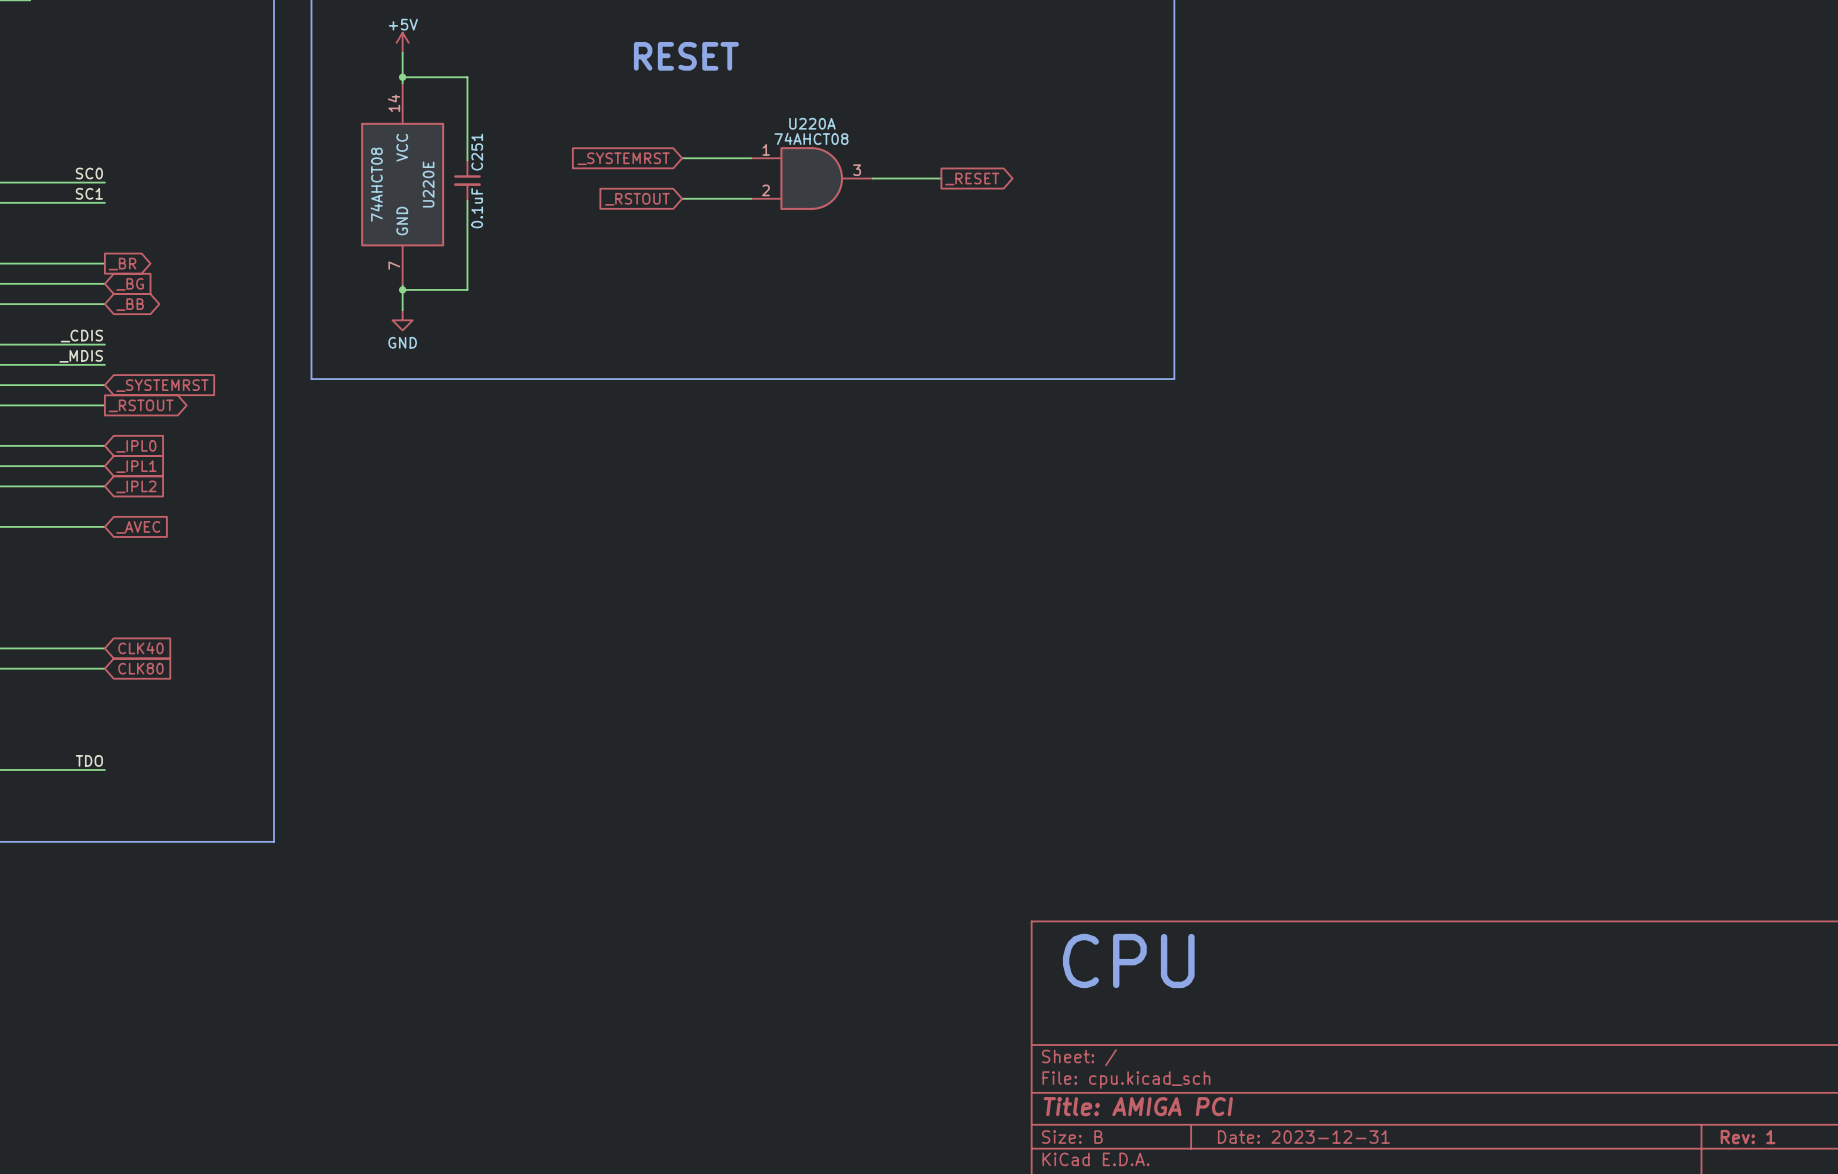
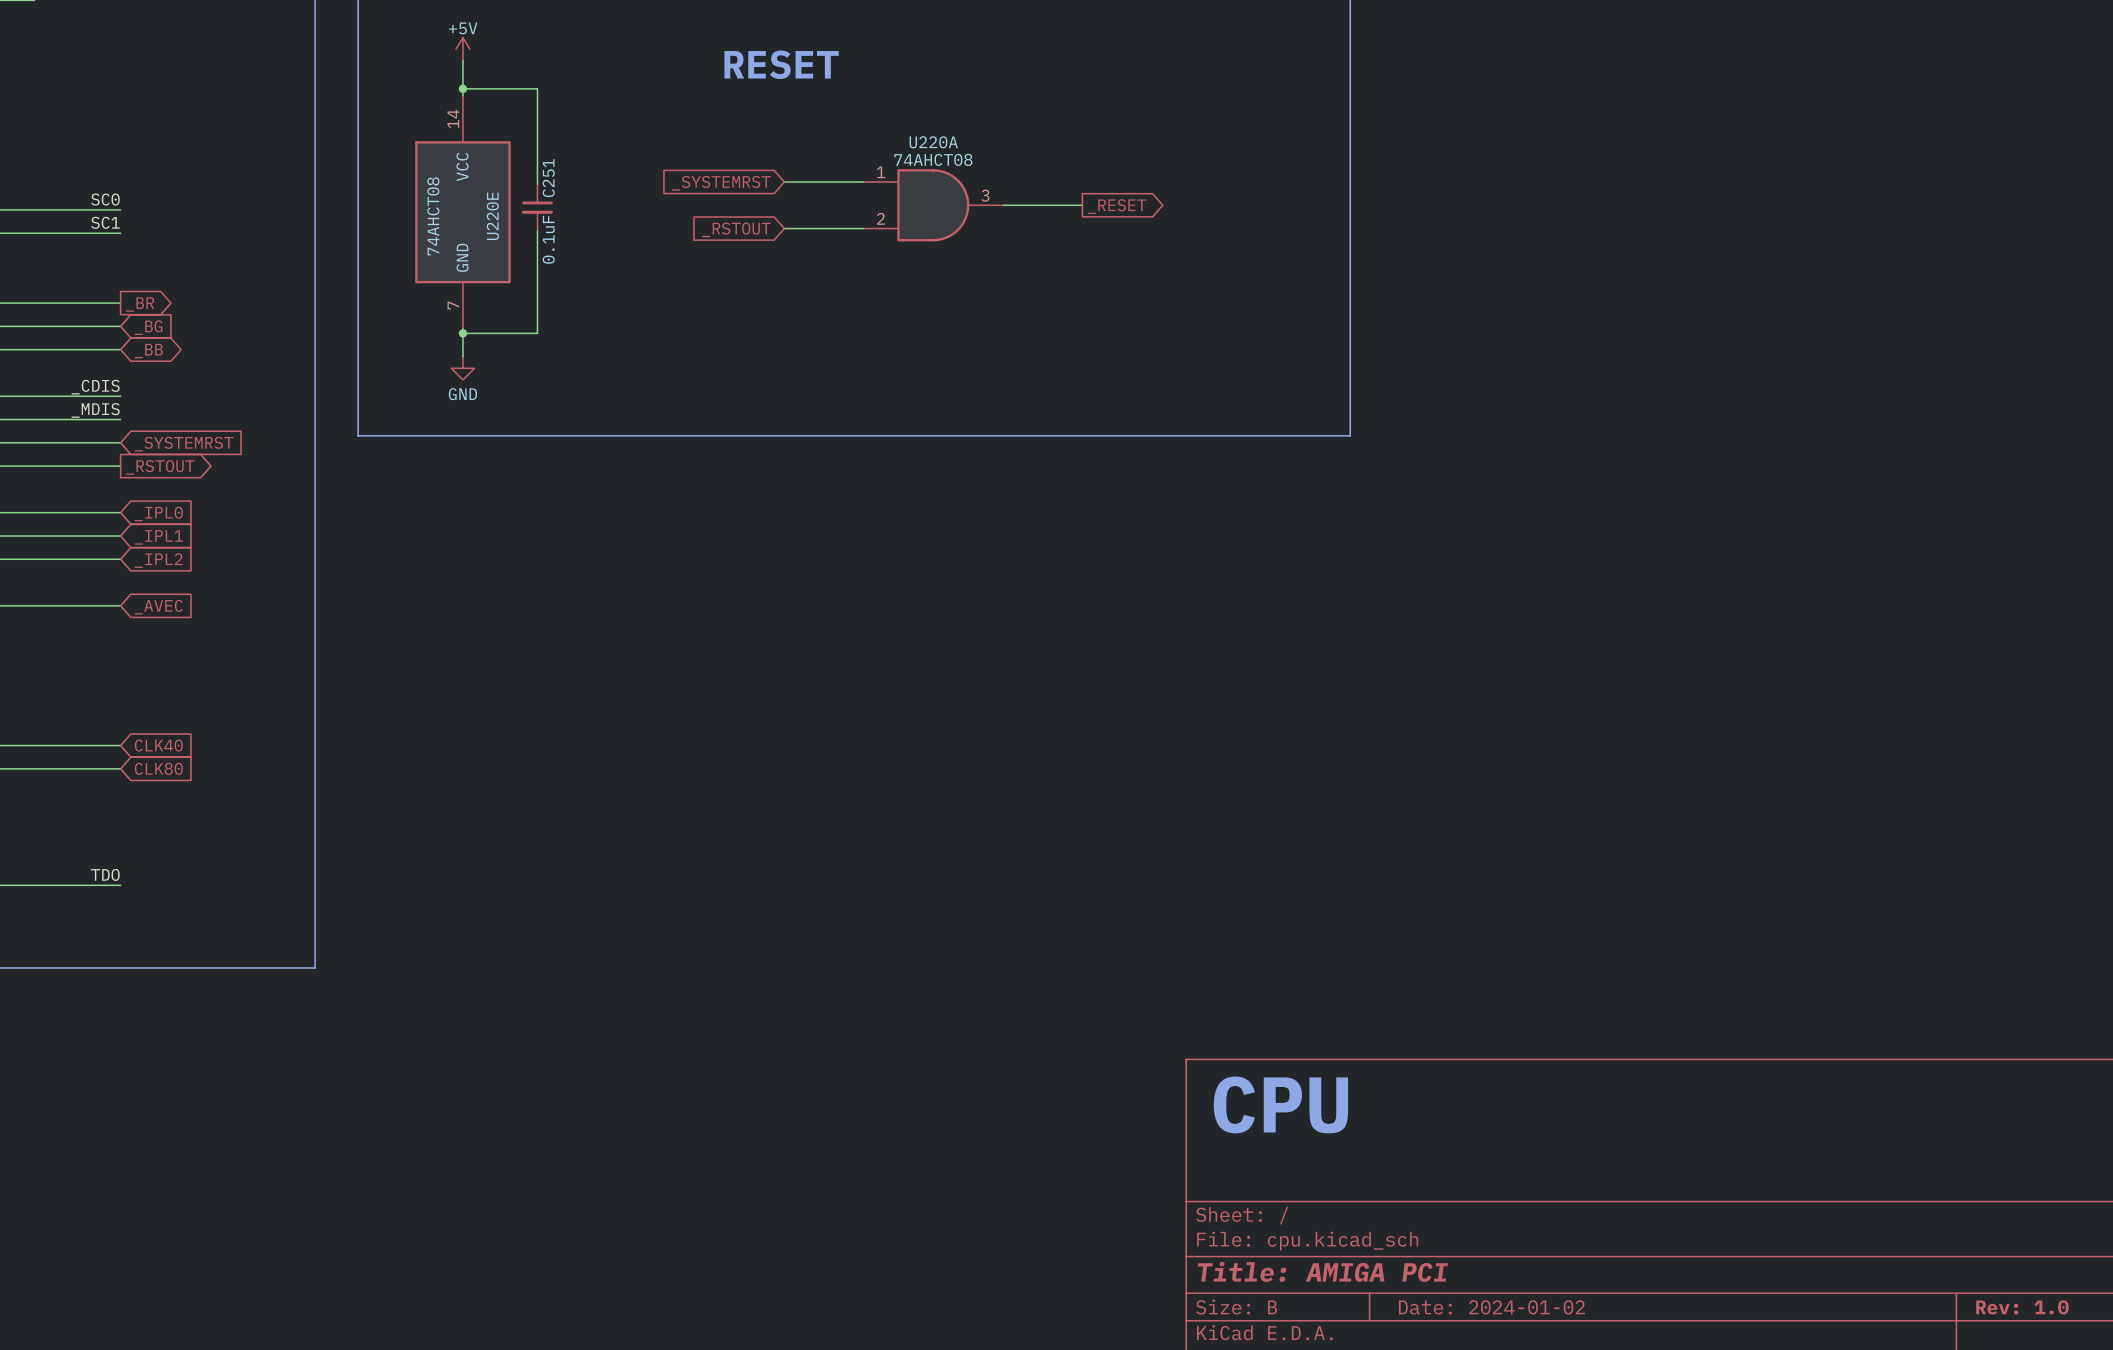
title block: Date: 2023-12-31 (1303, 1137) -> Date: 2024-01-02 (1491, 1307)
title block: Rev: 1 (1748, 1137) -> Rev: 1.0 (2022, 1307)

